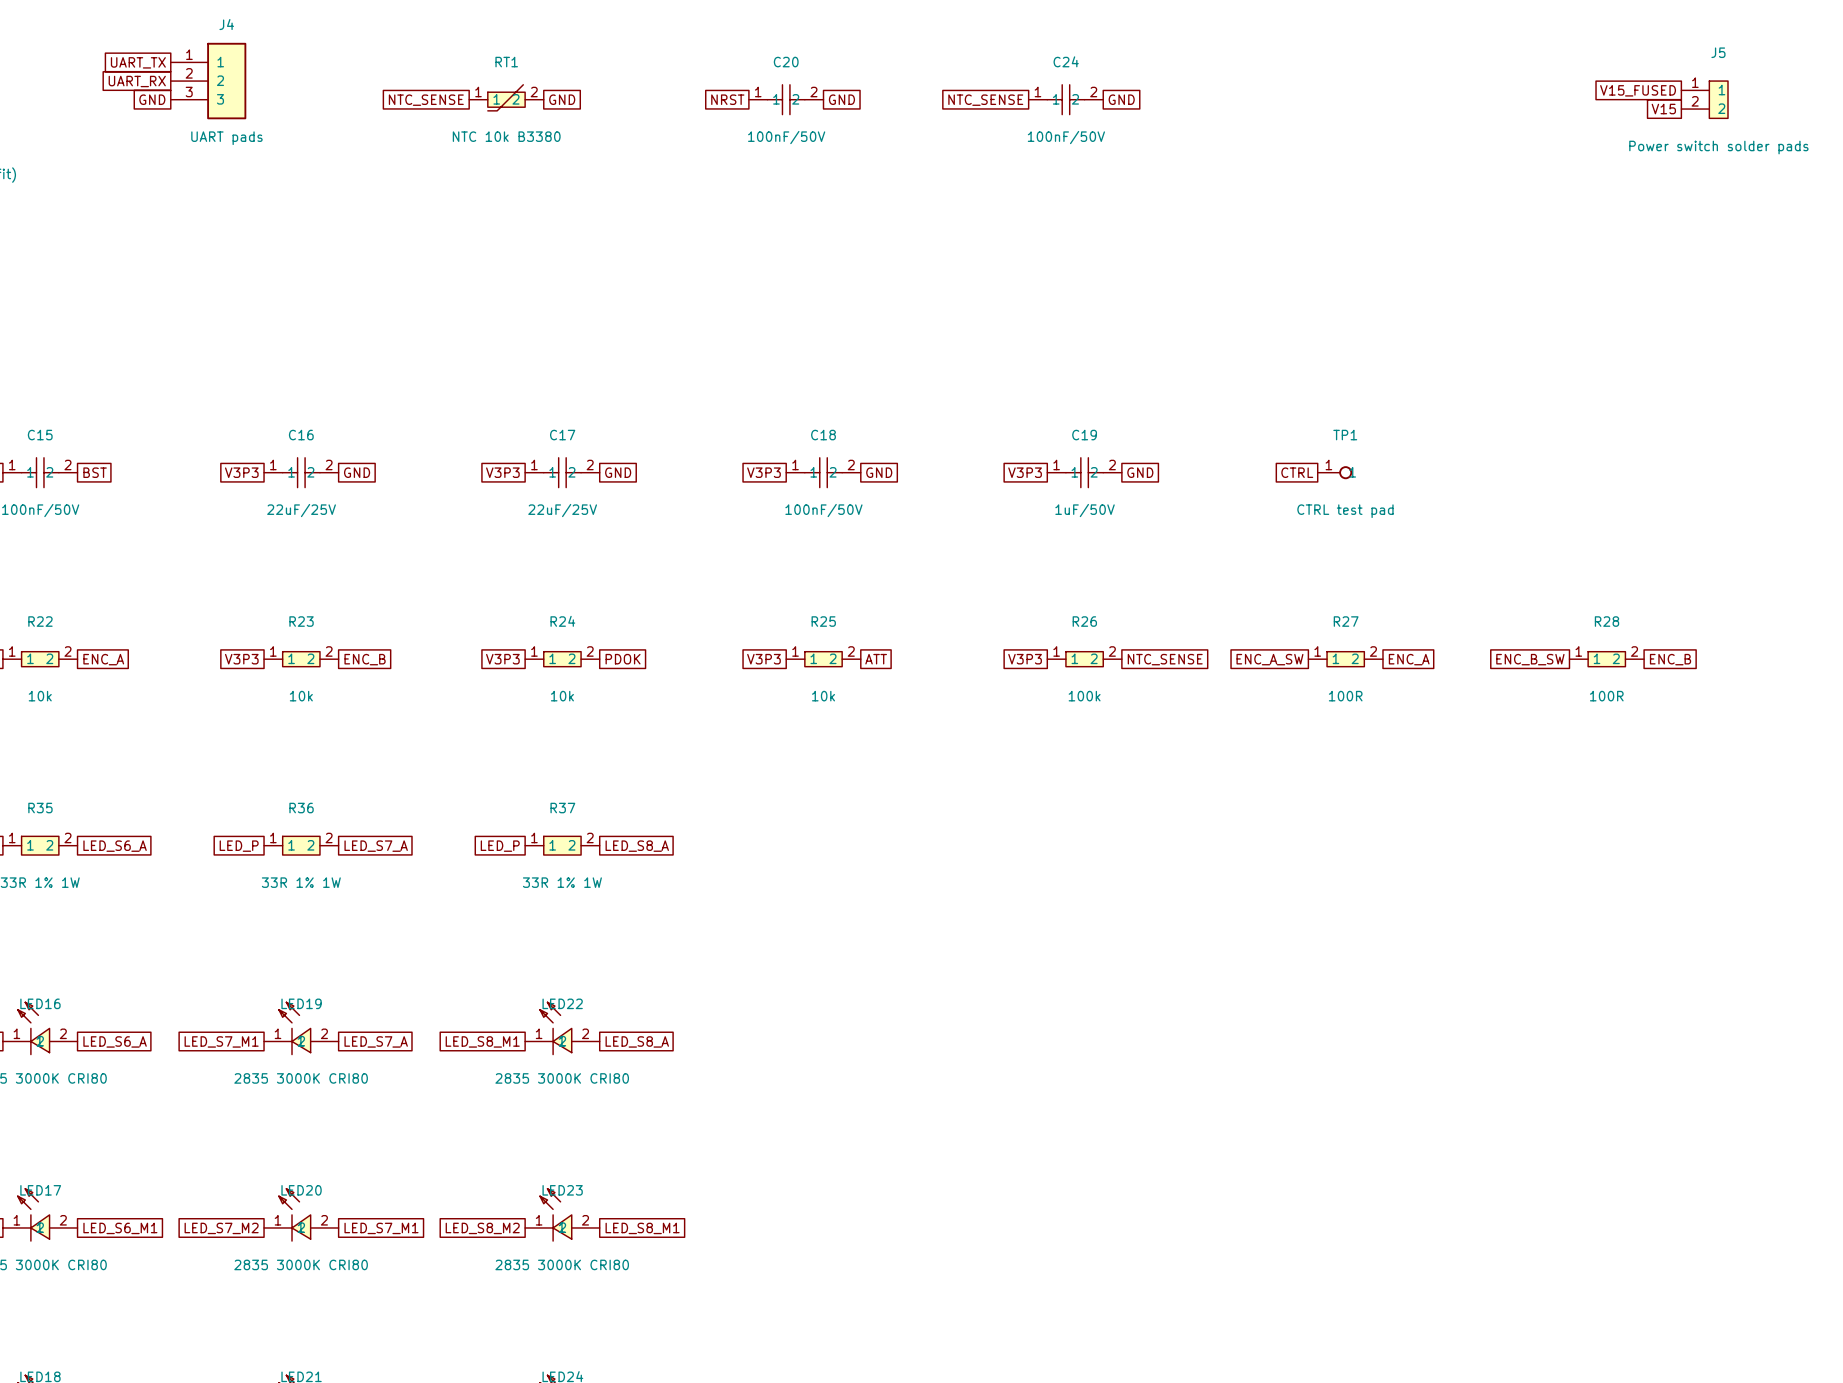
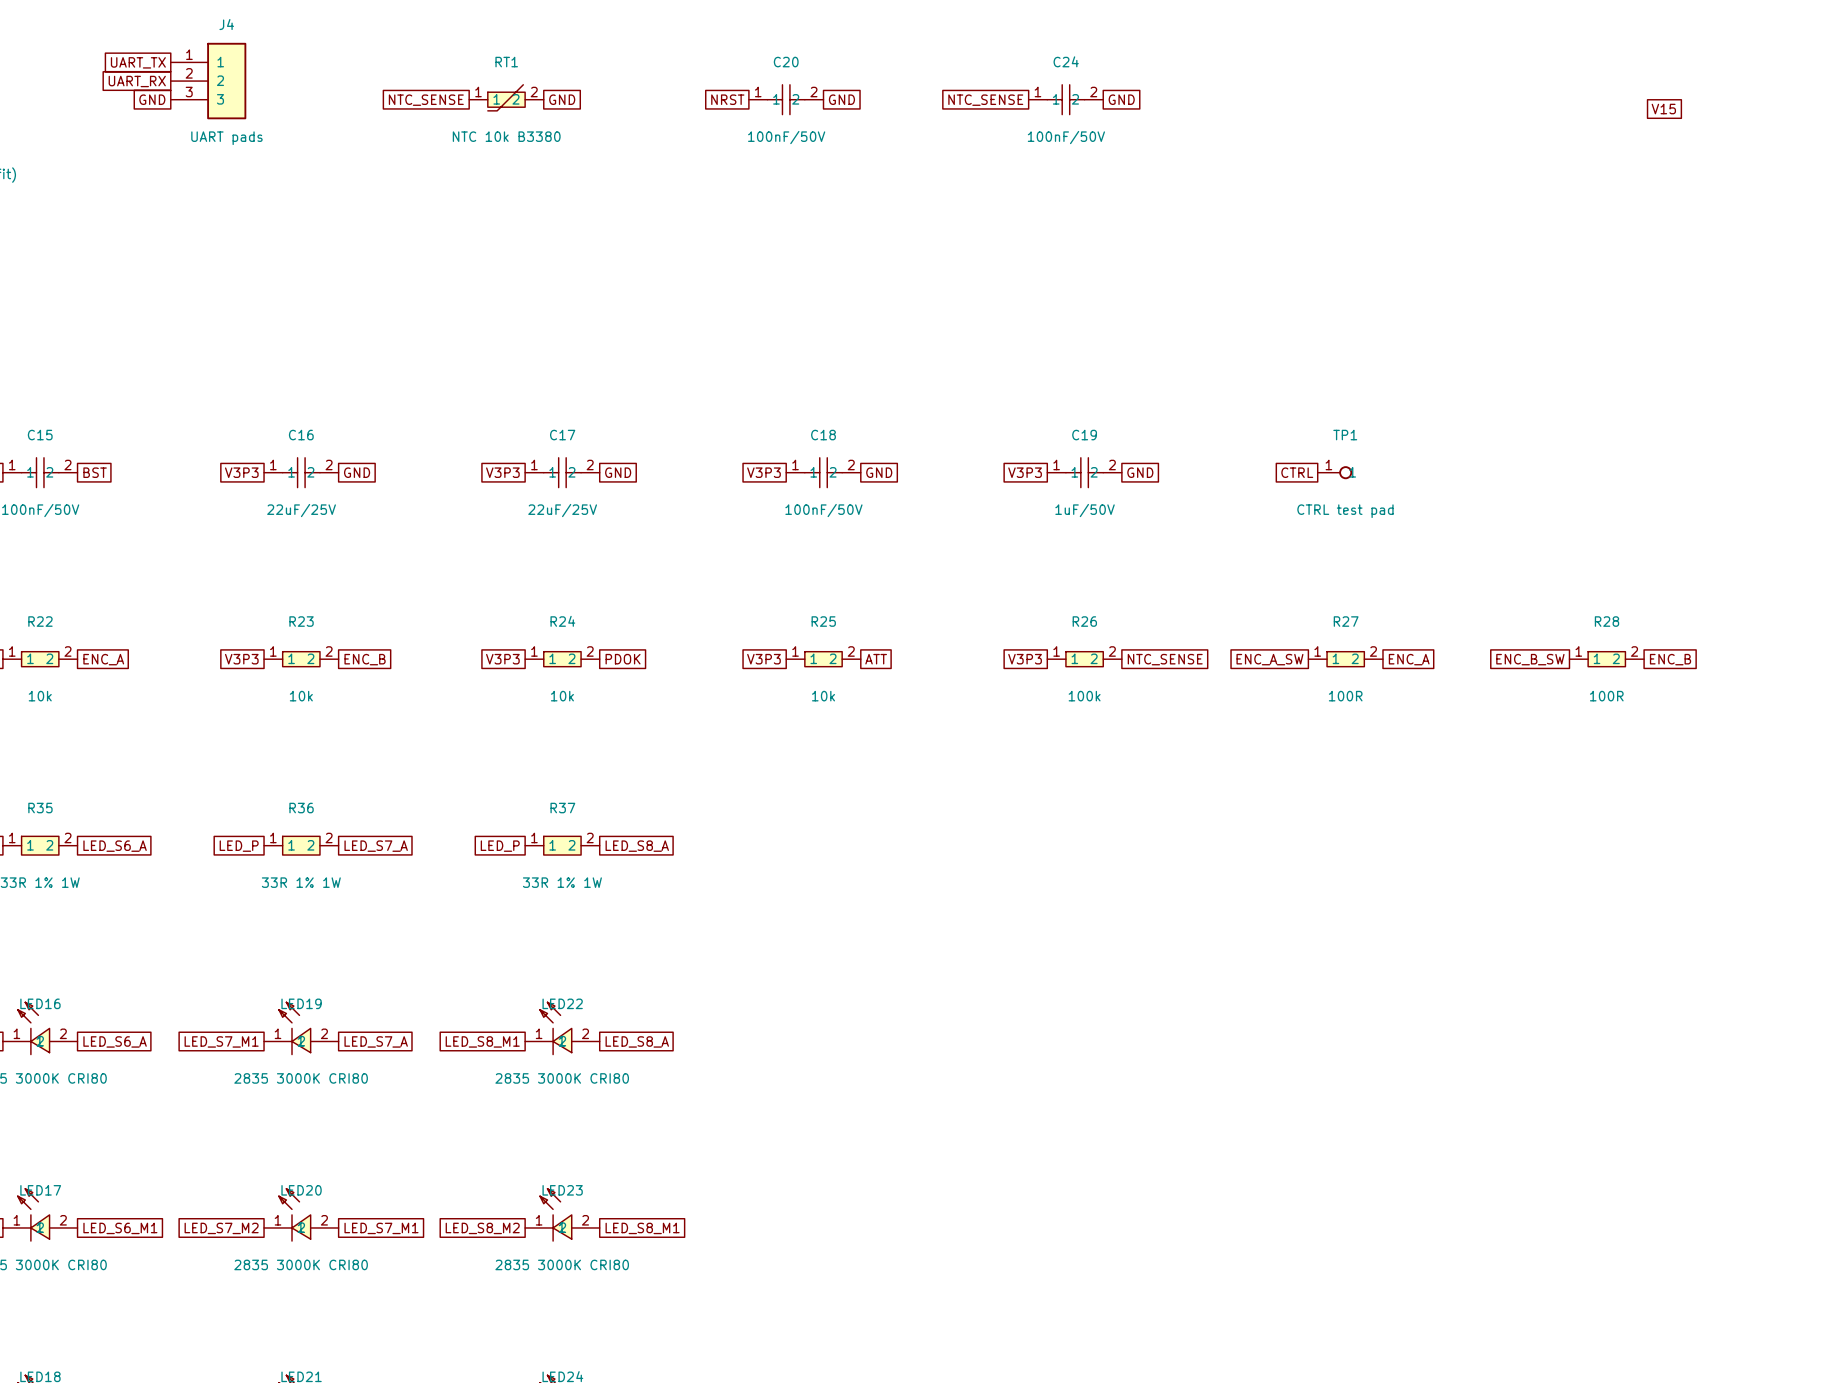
global label: V15_FUSED (1638, 90) -> none
J5: Power switch solder pads (1704, 99) -> none

